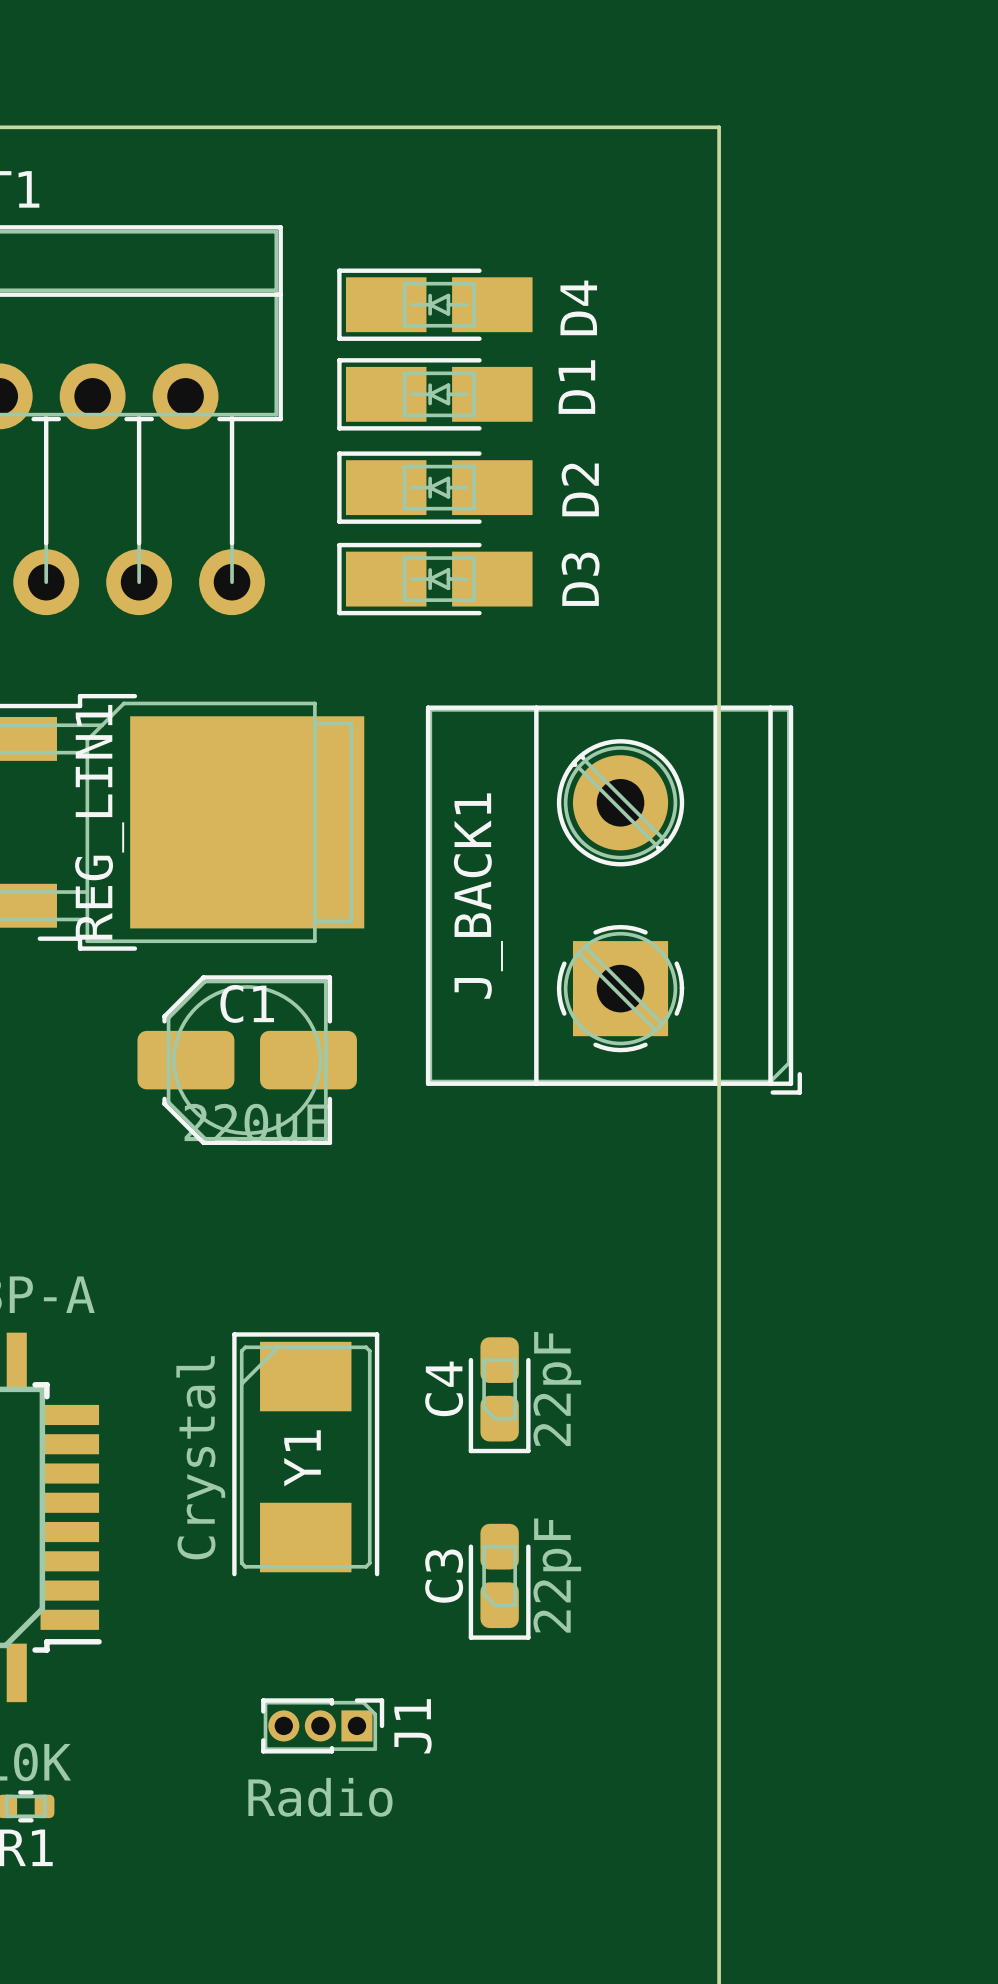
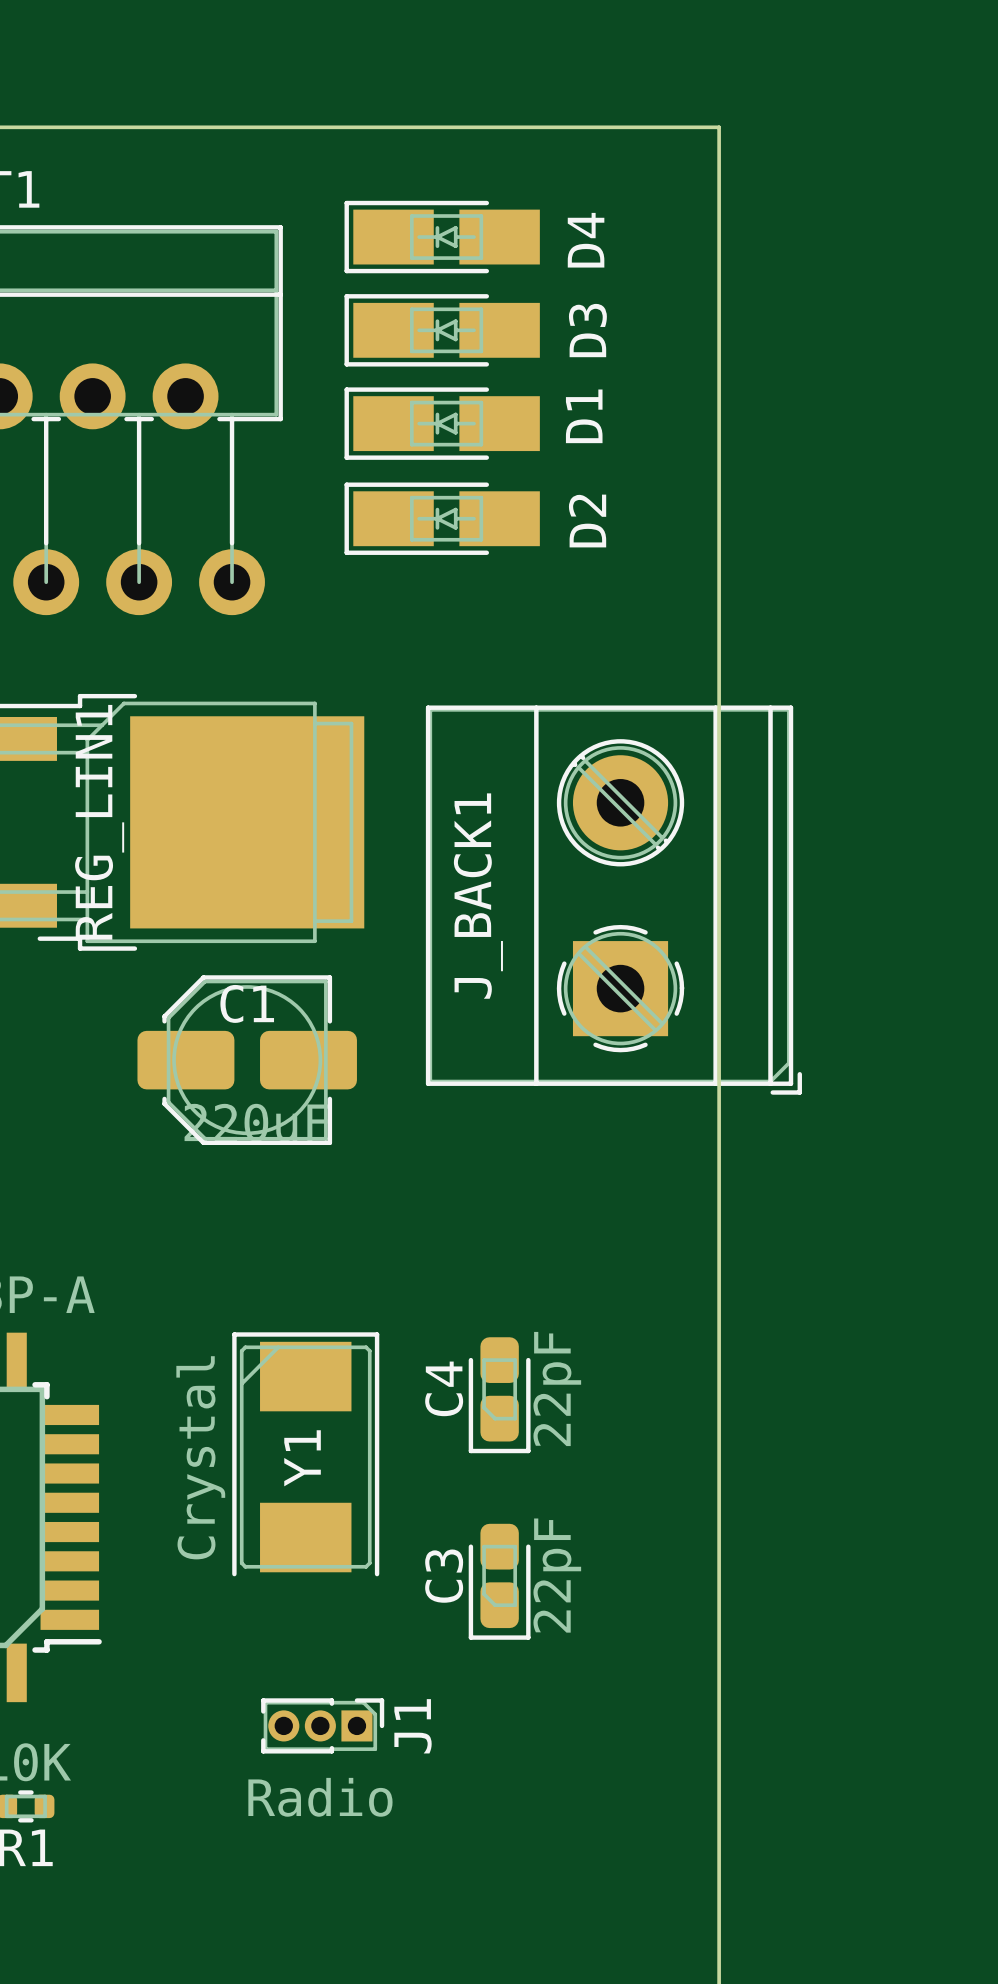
D4 position: (434, 304) -> (442, 237)
D1 position: (434, 394) -> (442, 423)
D2 position: (434, 487) -> (442, 518)
D3 position: (434, 579) -> (442, 330)

